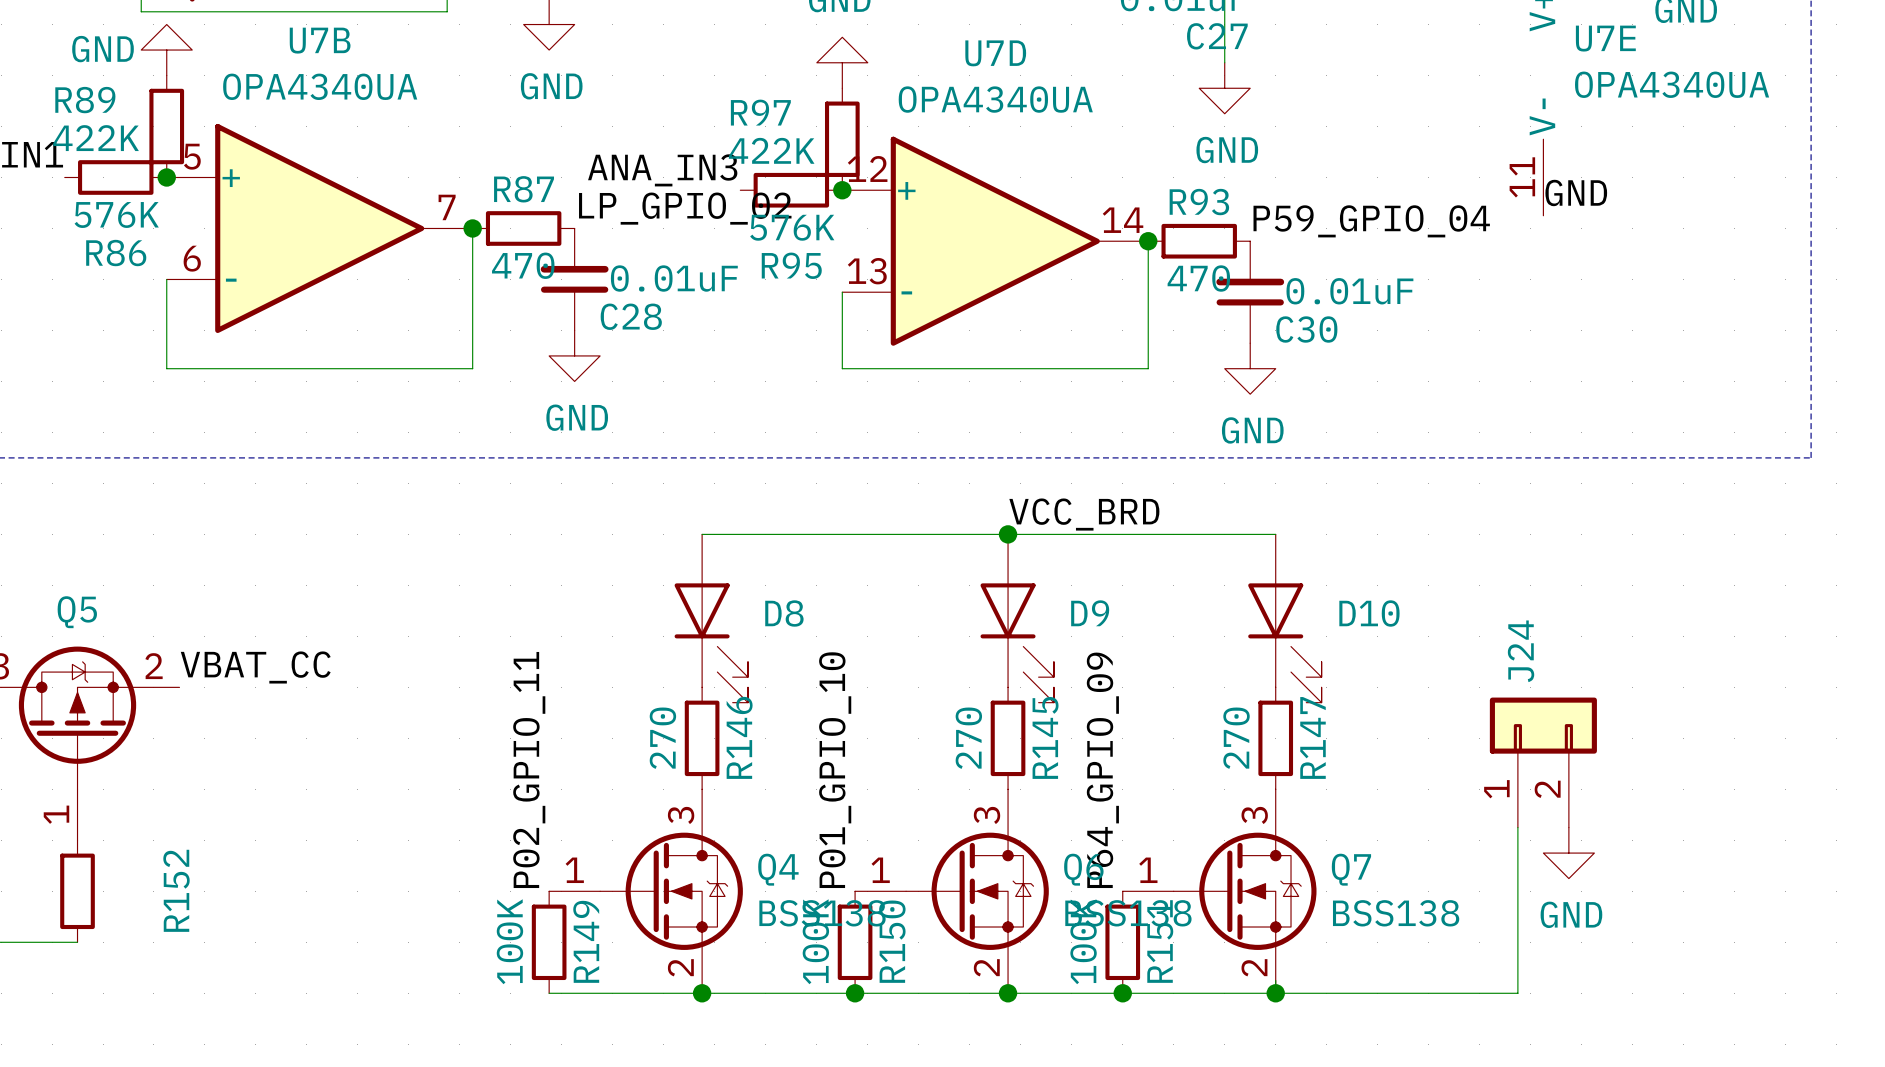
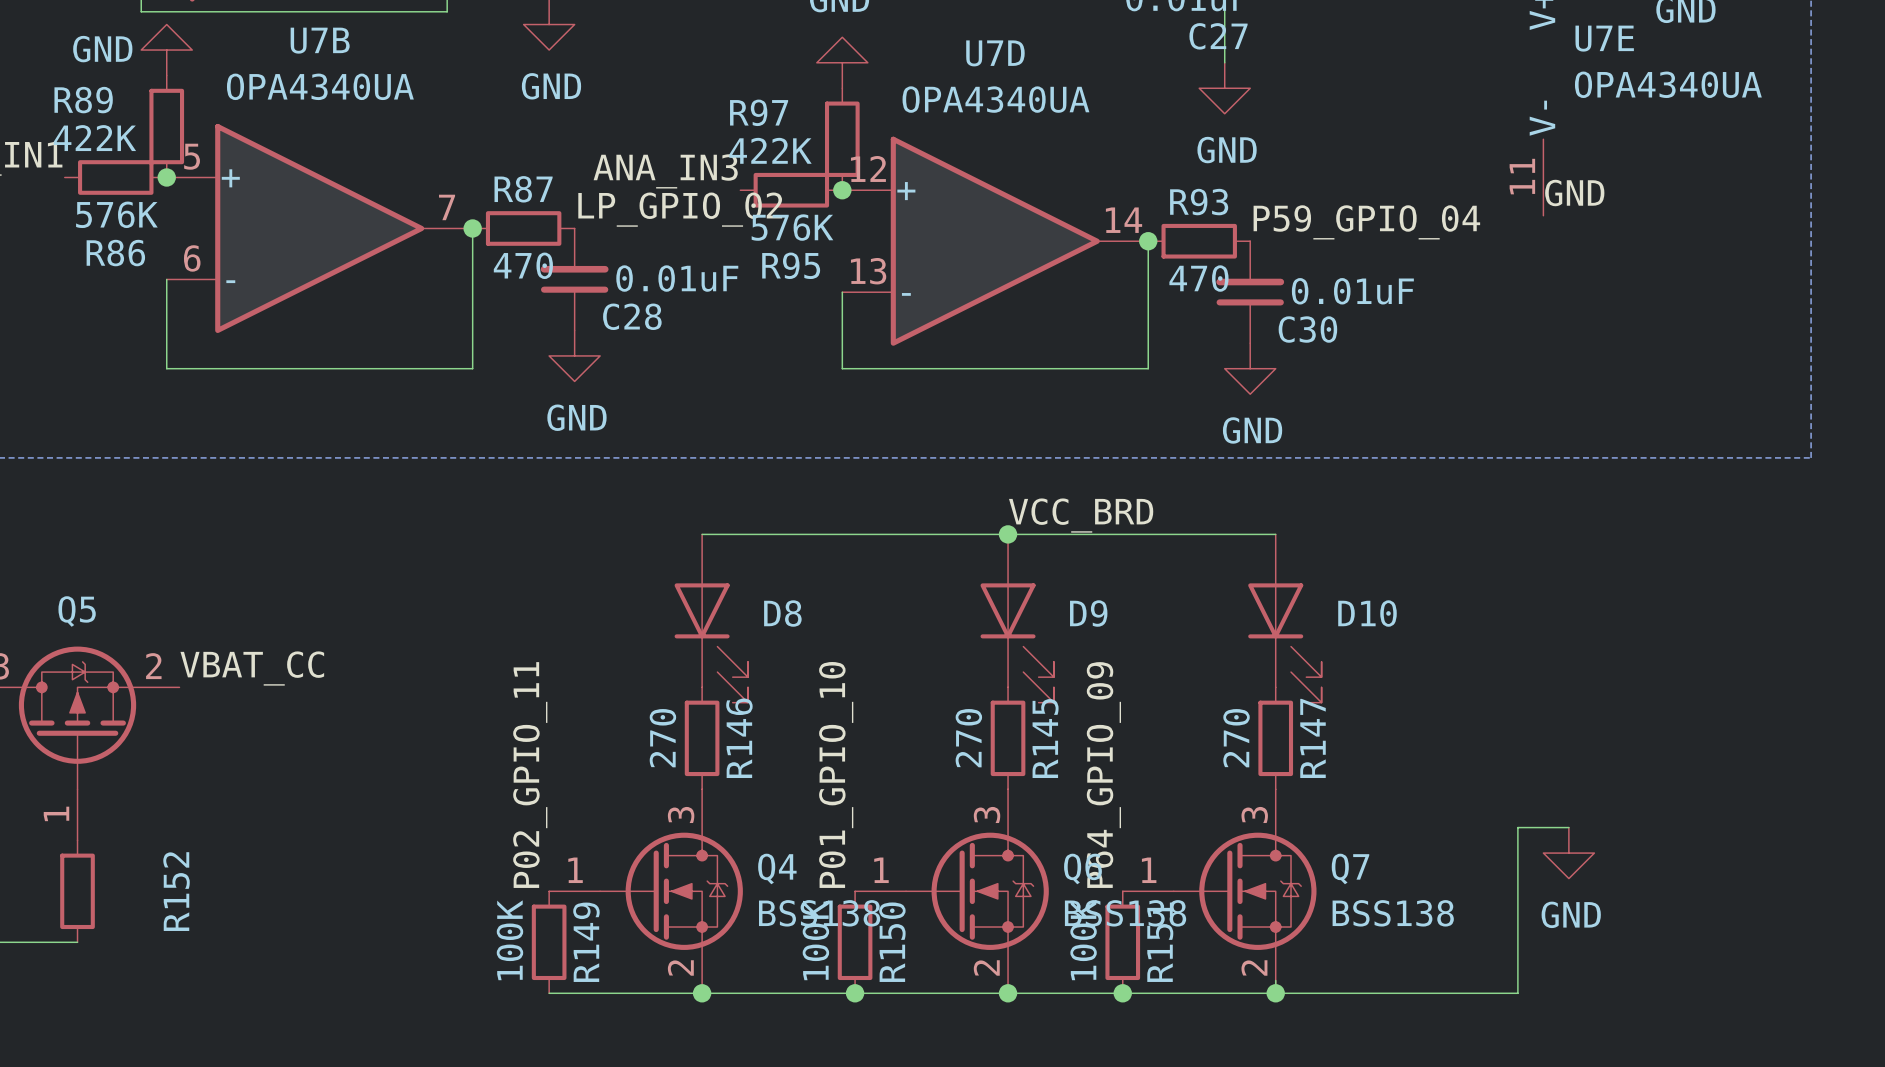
J24: (1543, 762) -> none
wire: none -> (1517, 827) (1568, 827)

